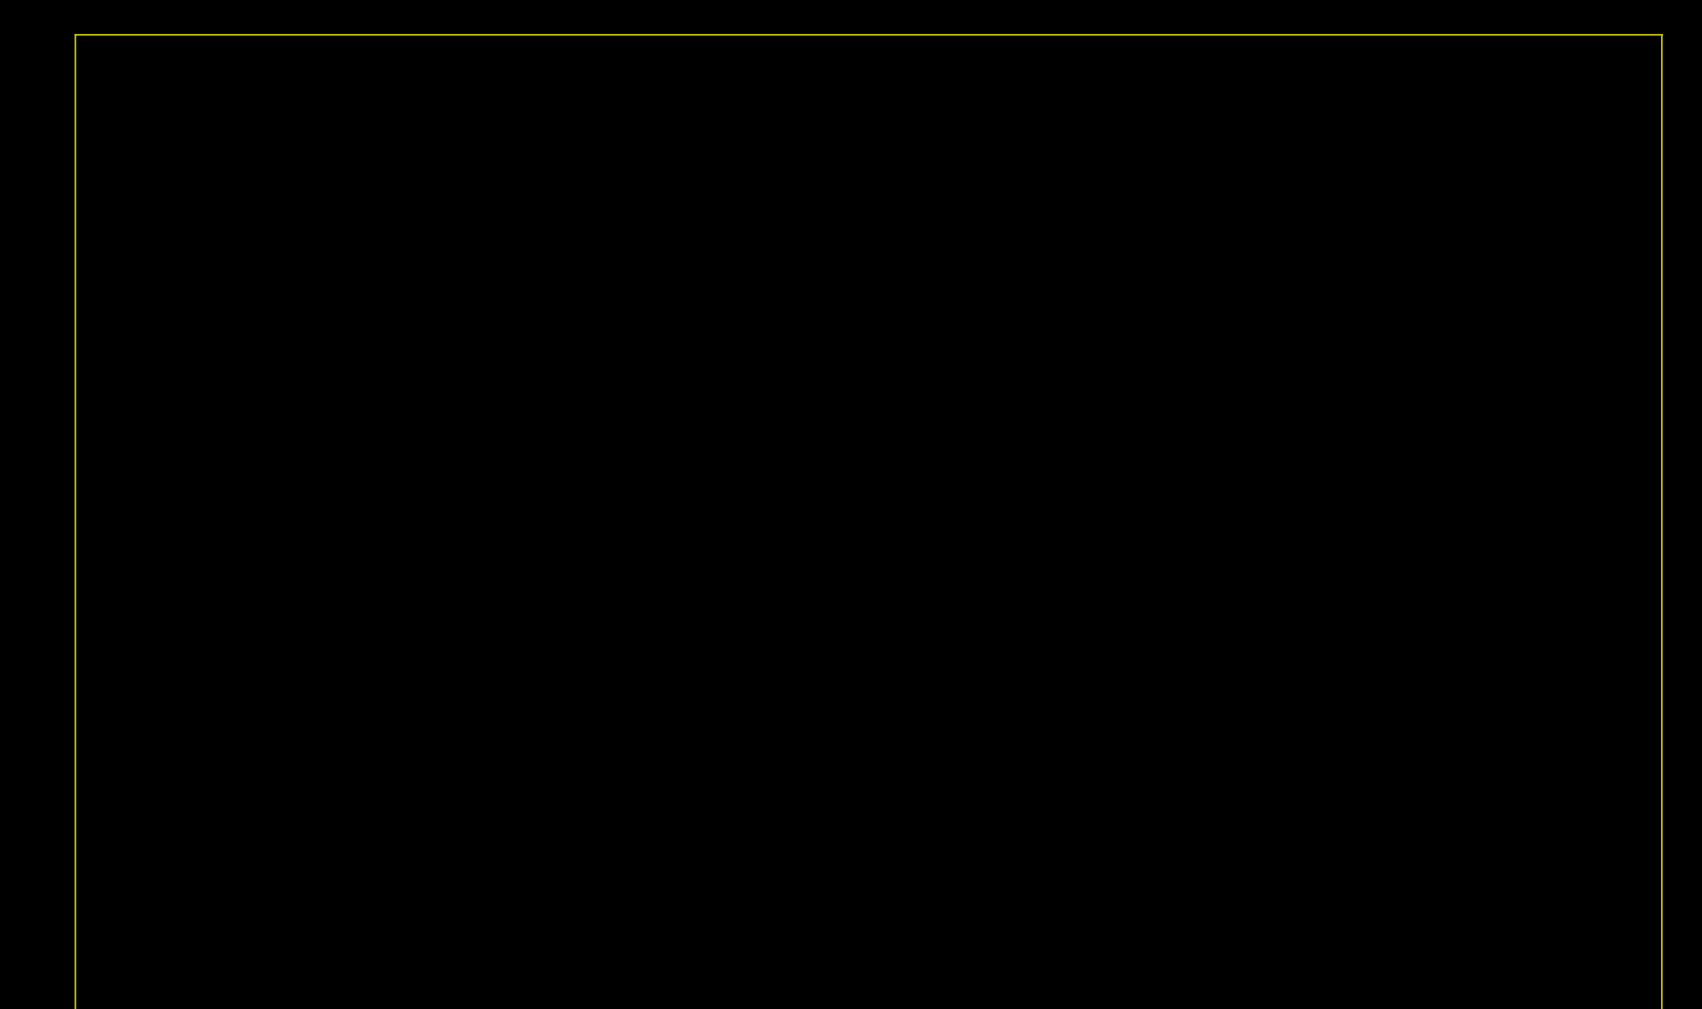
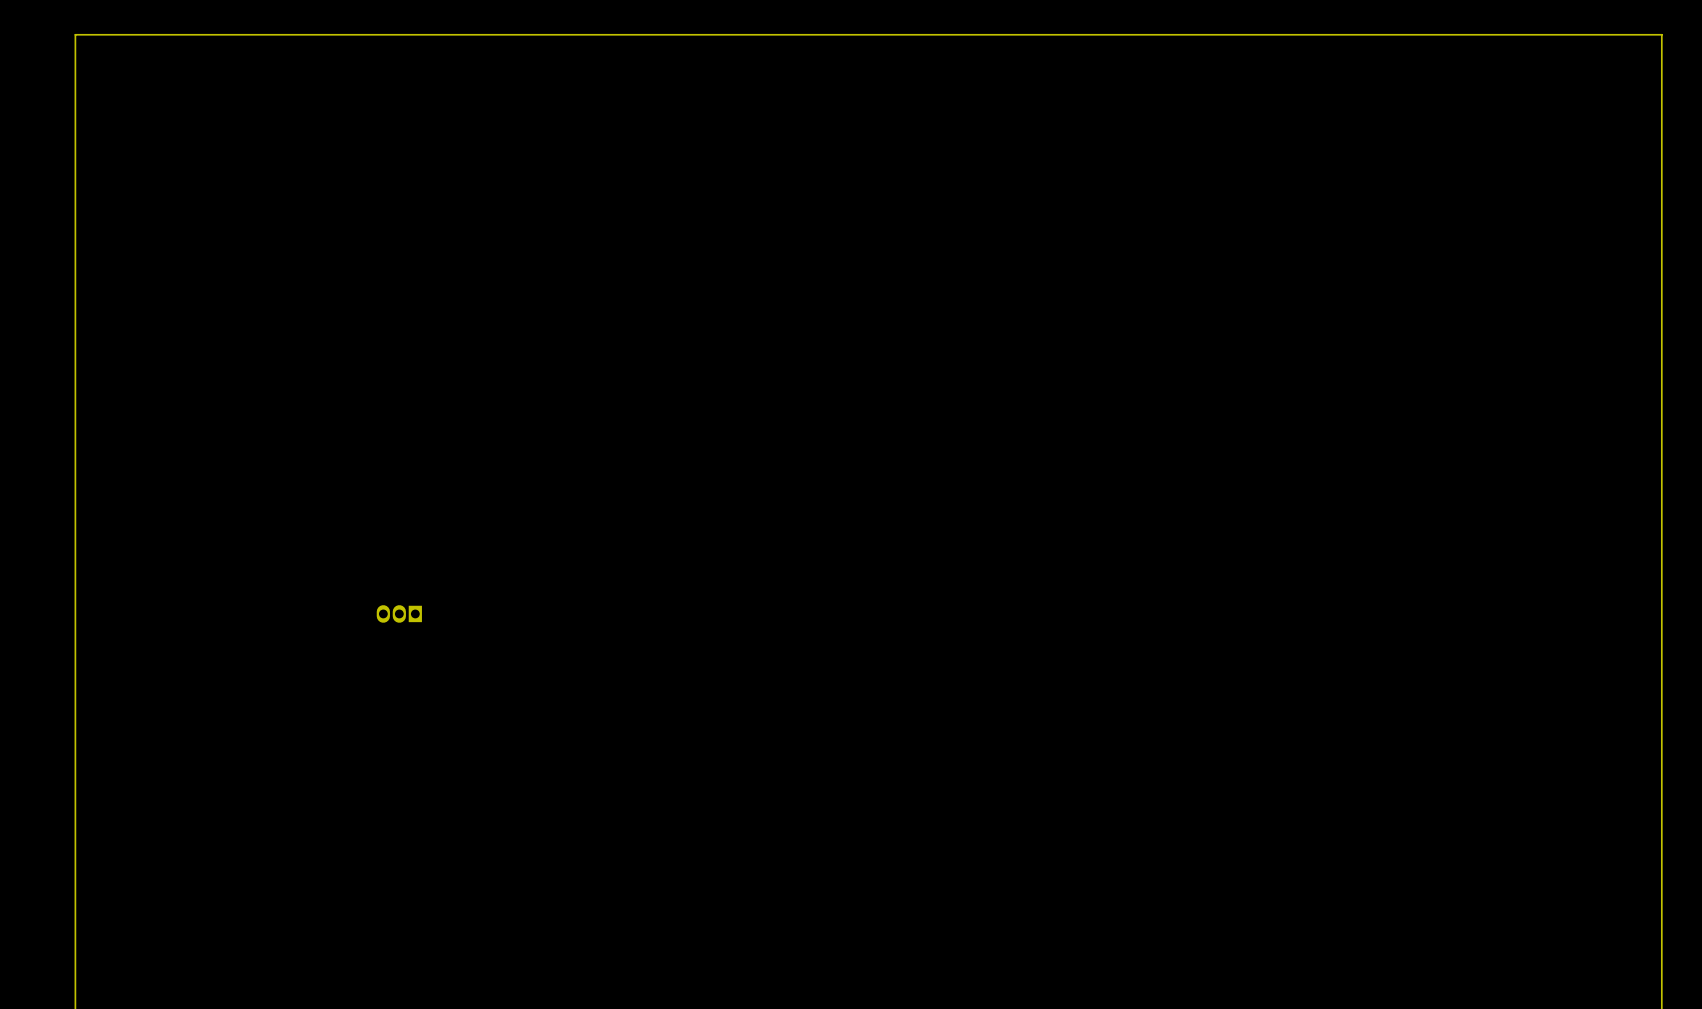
part: none -> (399, 613)

